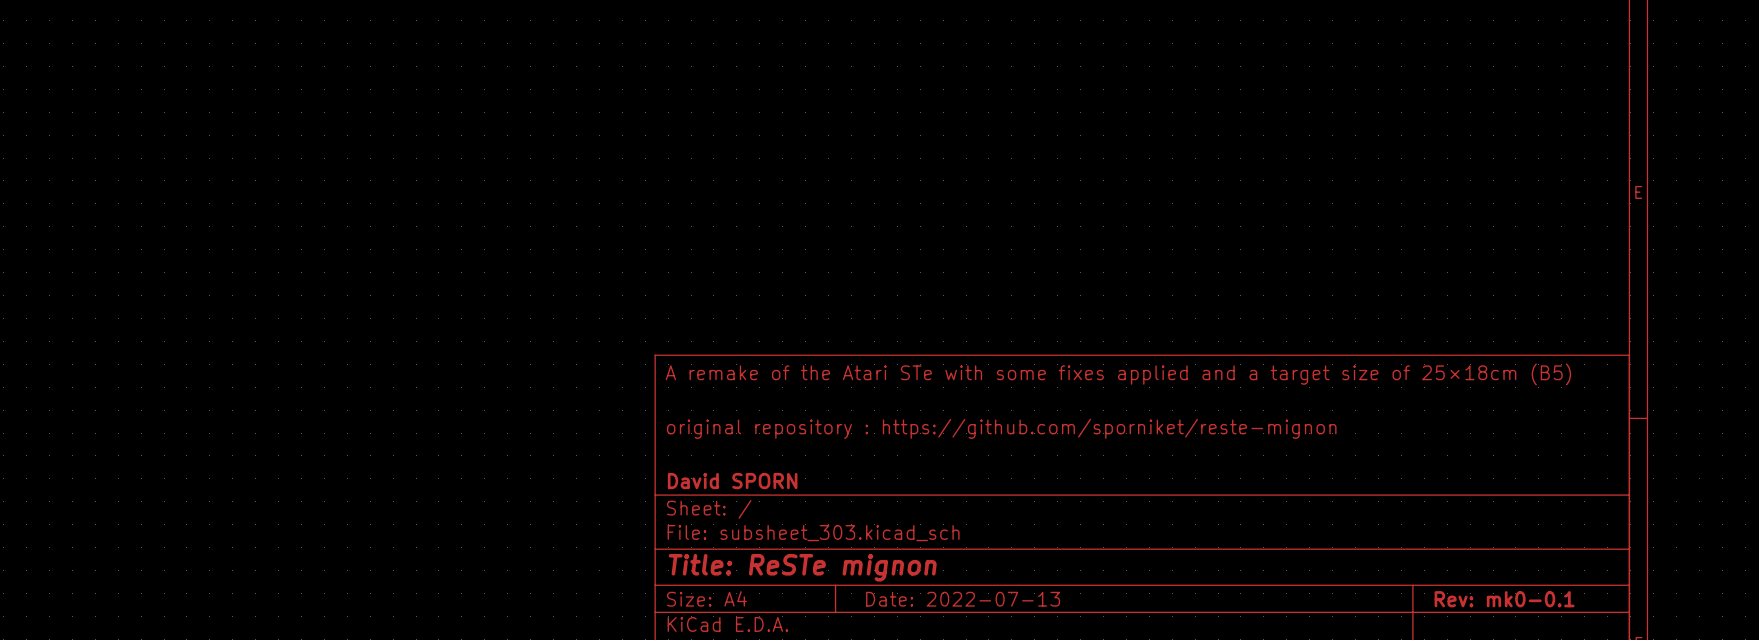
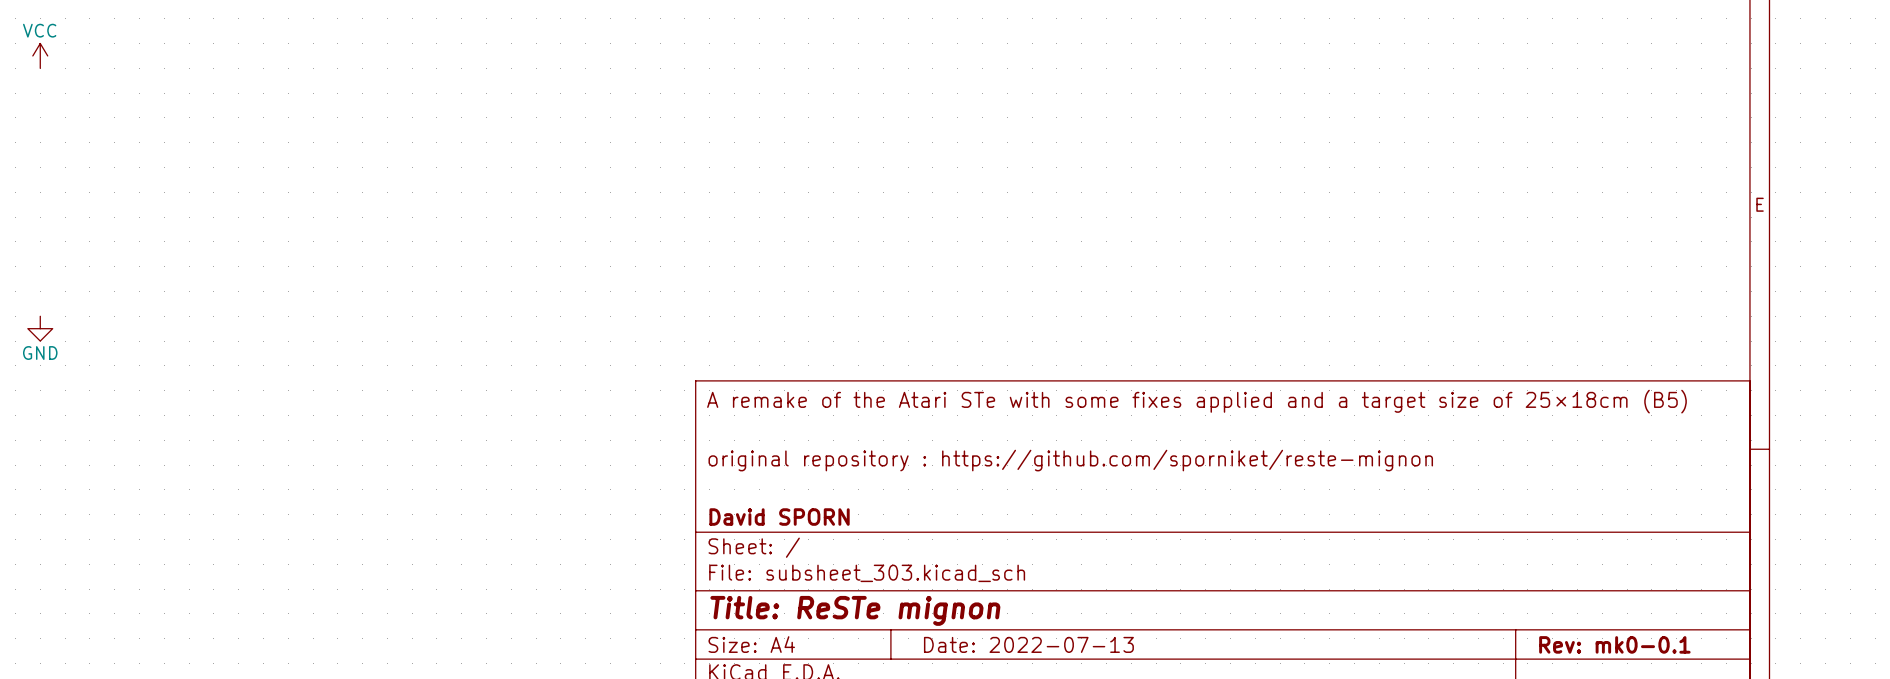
power symbol: none -> VCC (40, 55)
power symbol: none -> GND (40, 328)

